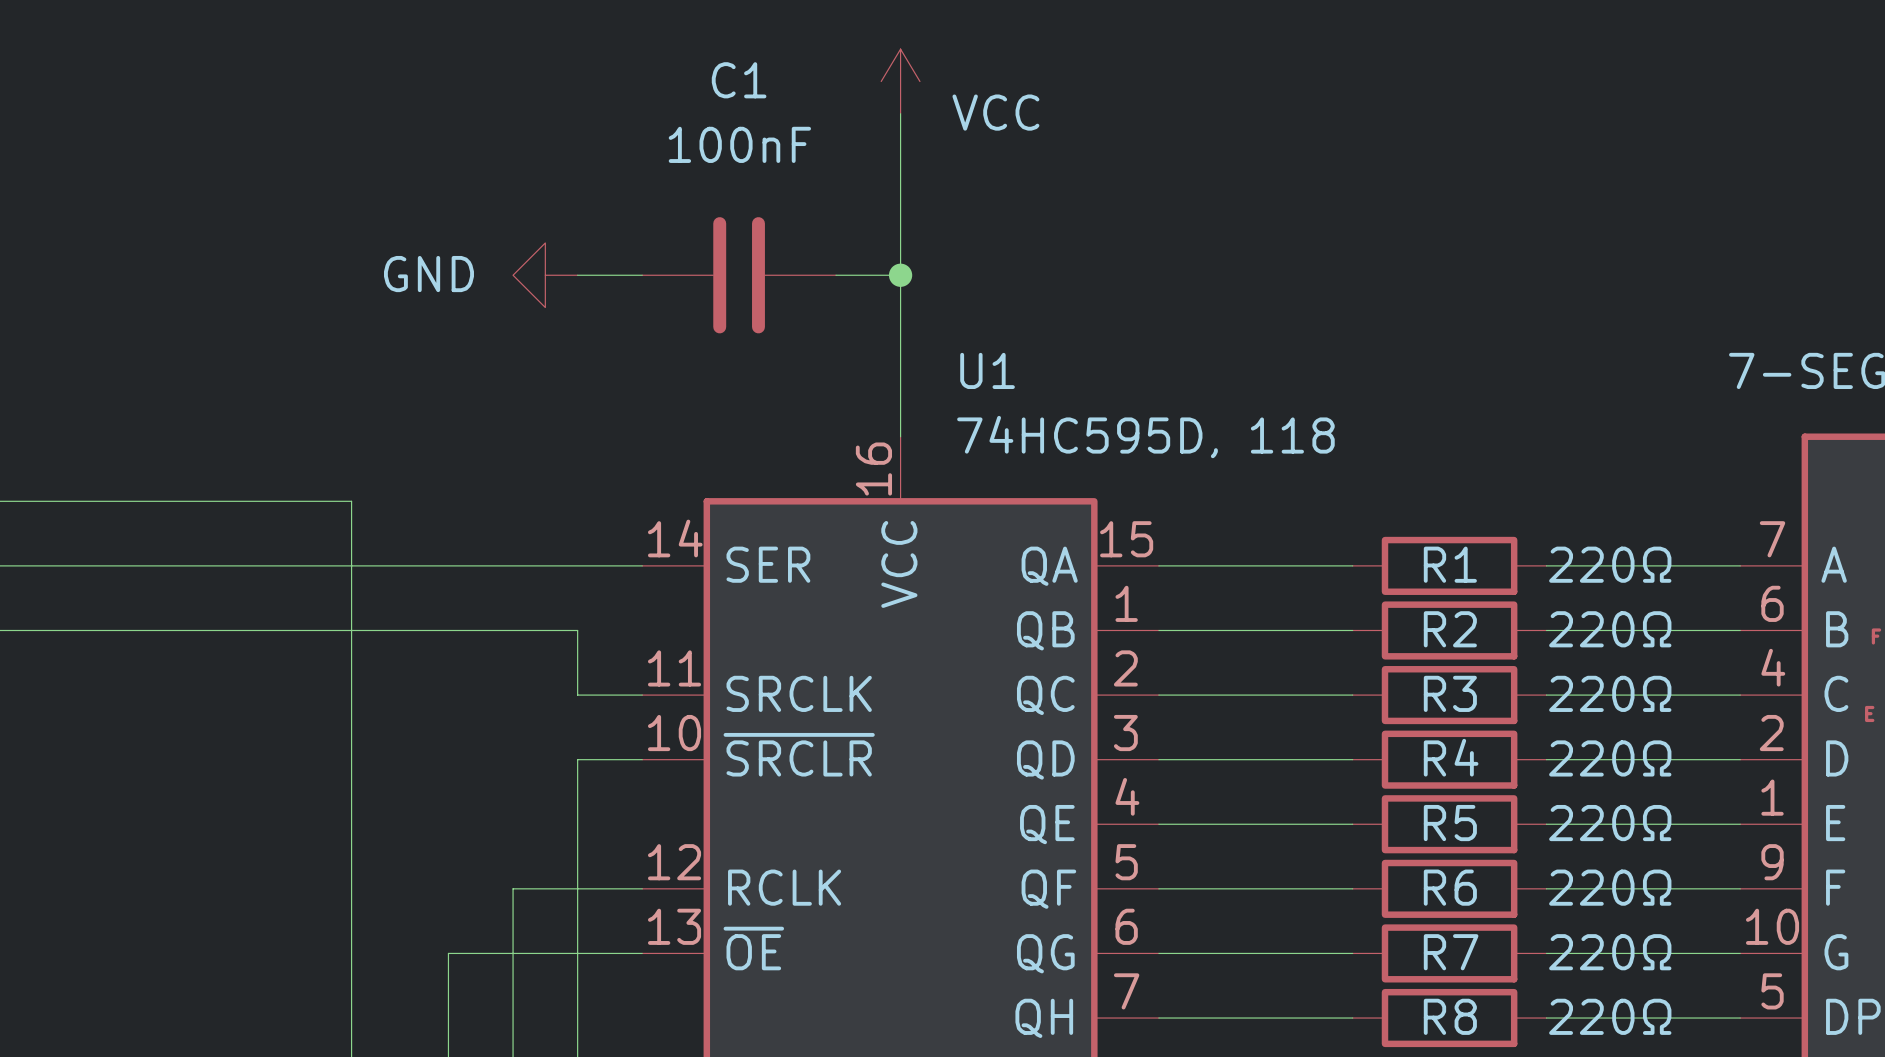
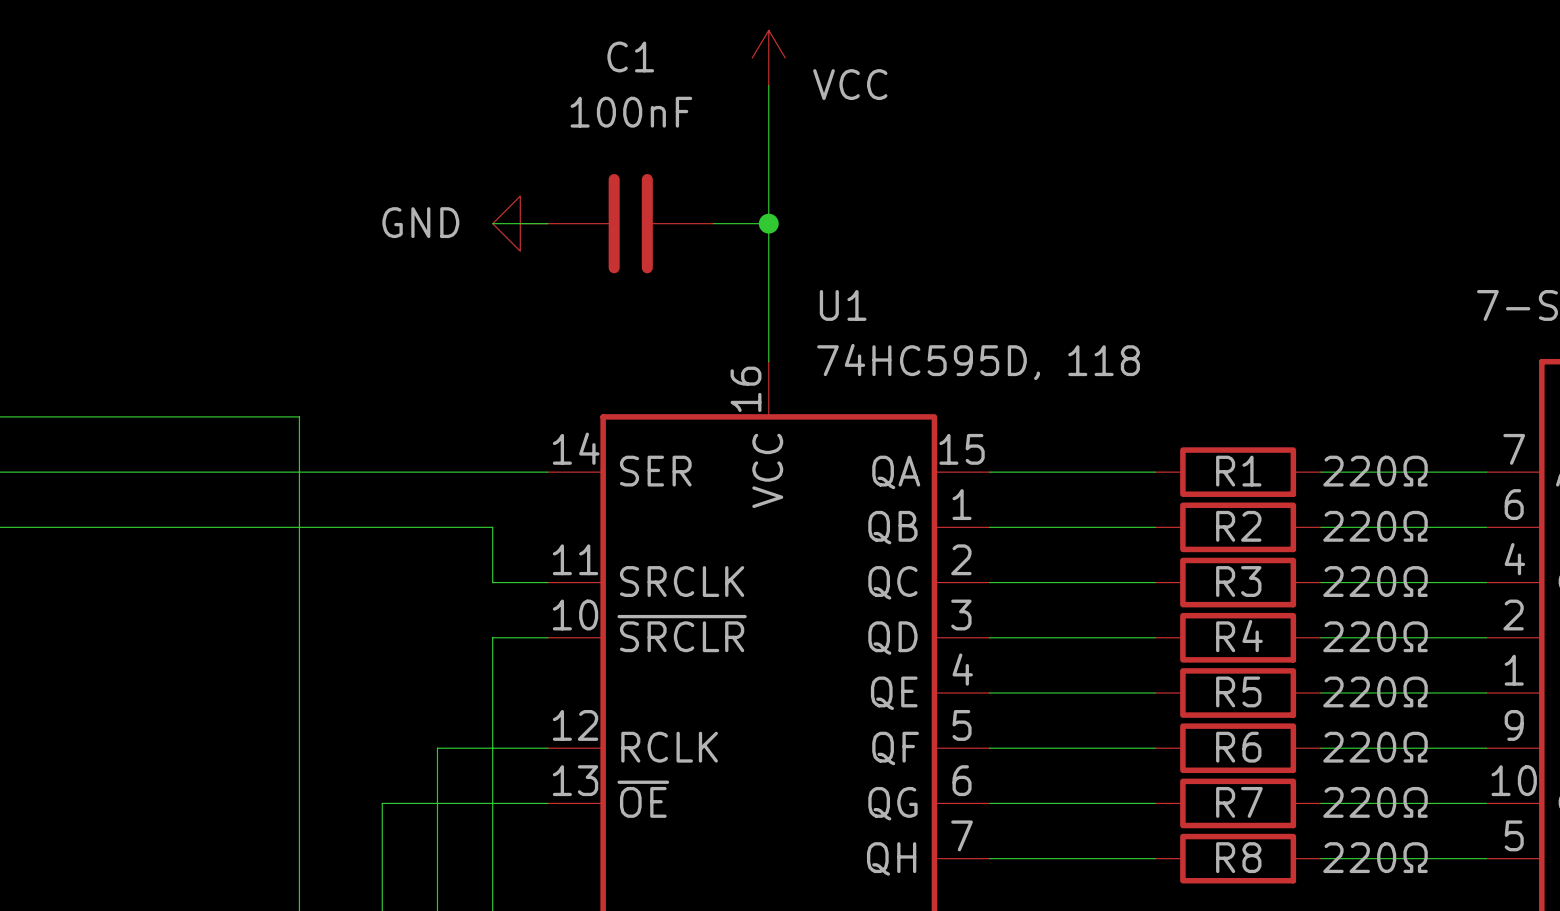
power symbol position: GND (545, 275) -> GND (520, 223)

